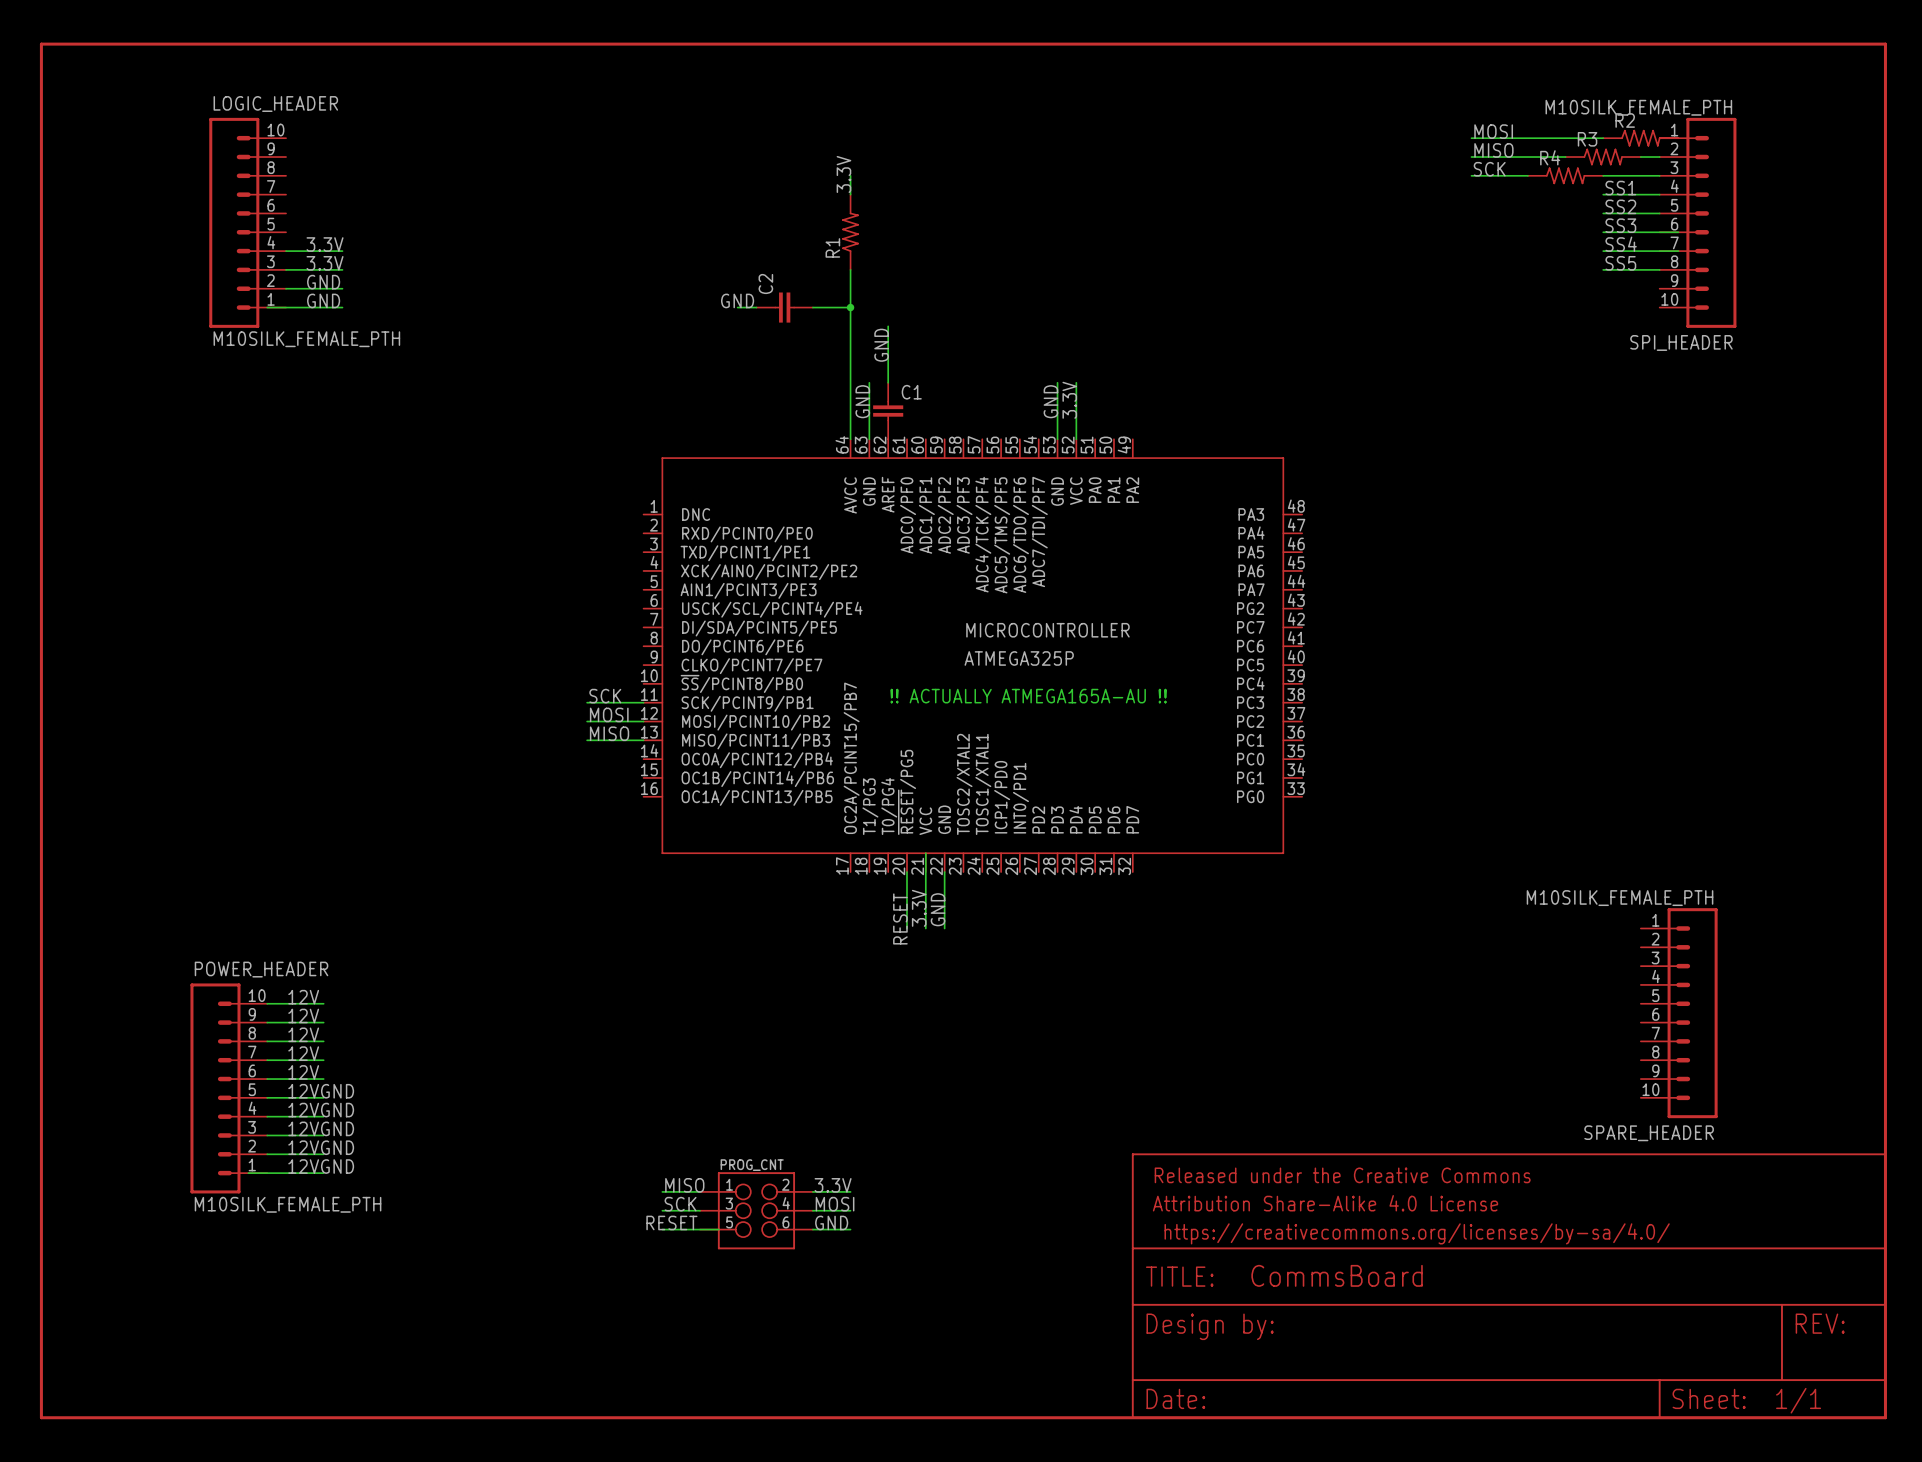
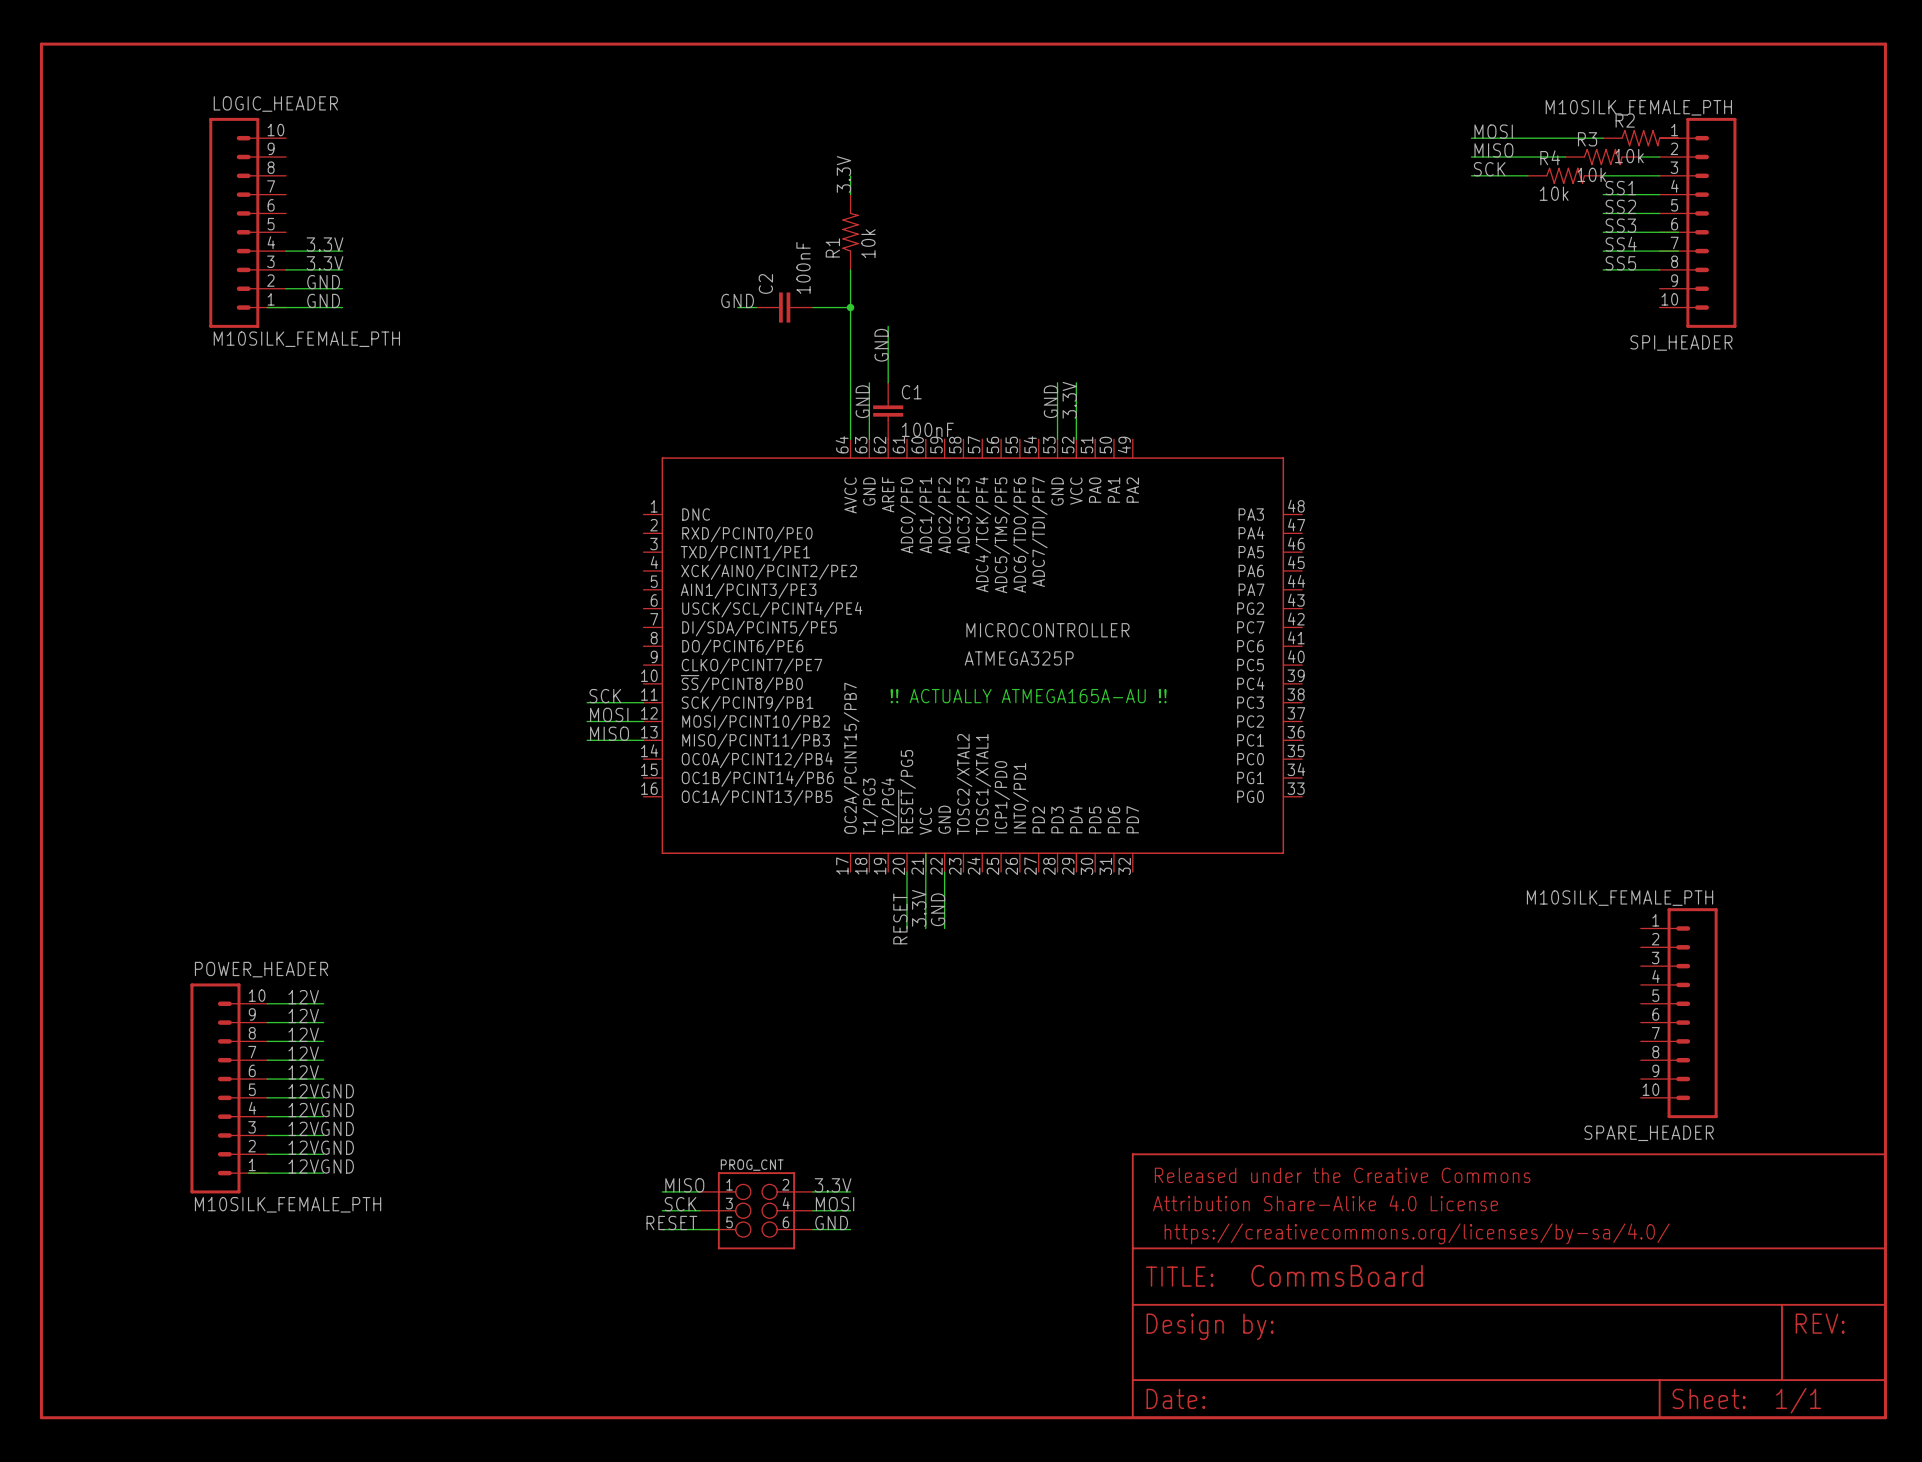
R2 value: none -> 10k (1629, 156)
R3 value: none -> 10k (1591, 174)
R4 value: none -> 10k (1554, 193)
R1 value: none -> 10k (868, 243)
C2 value: none -> 100nF (803, 267)
C1 value: none -> 100nF (927, 429)

